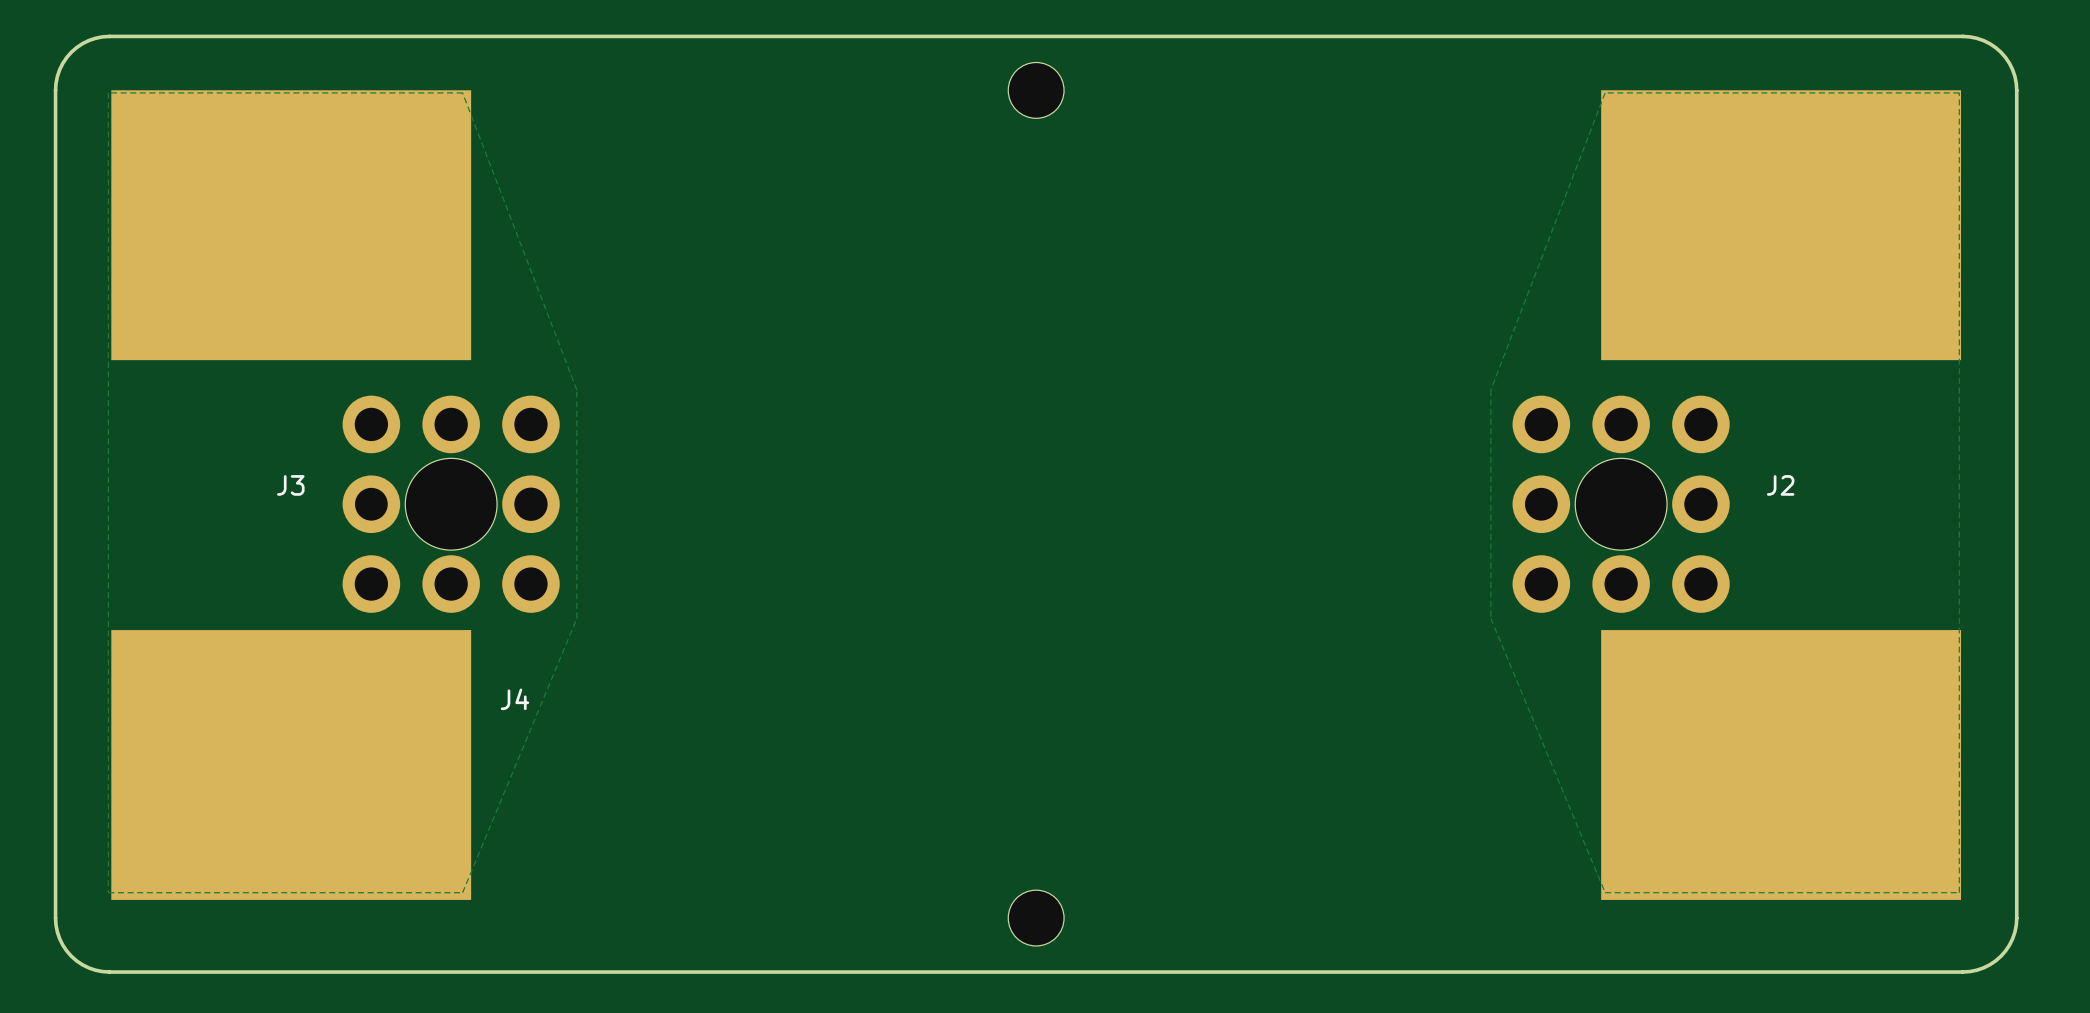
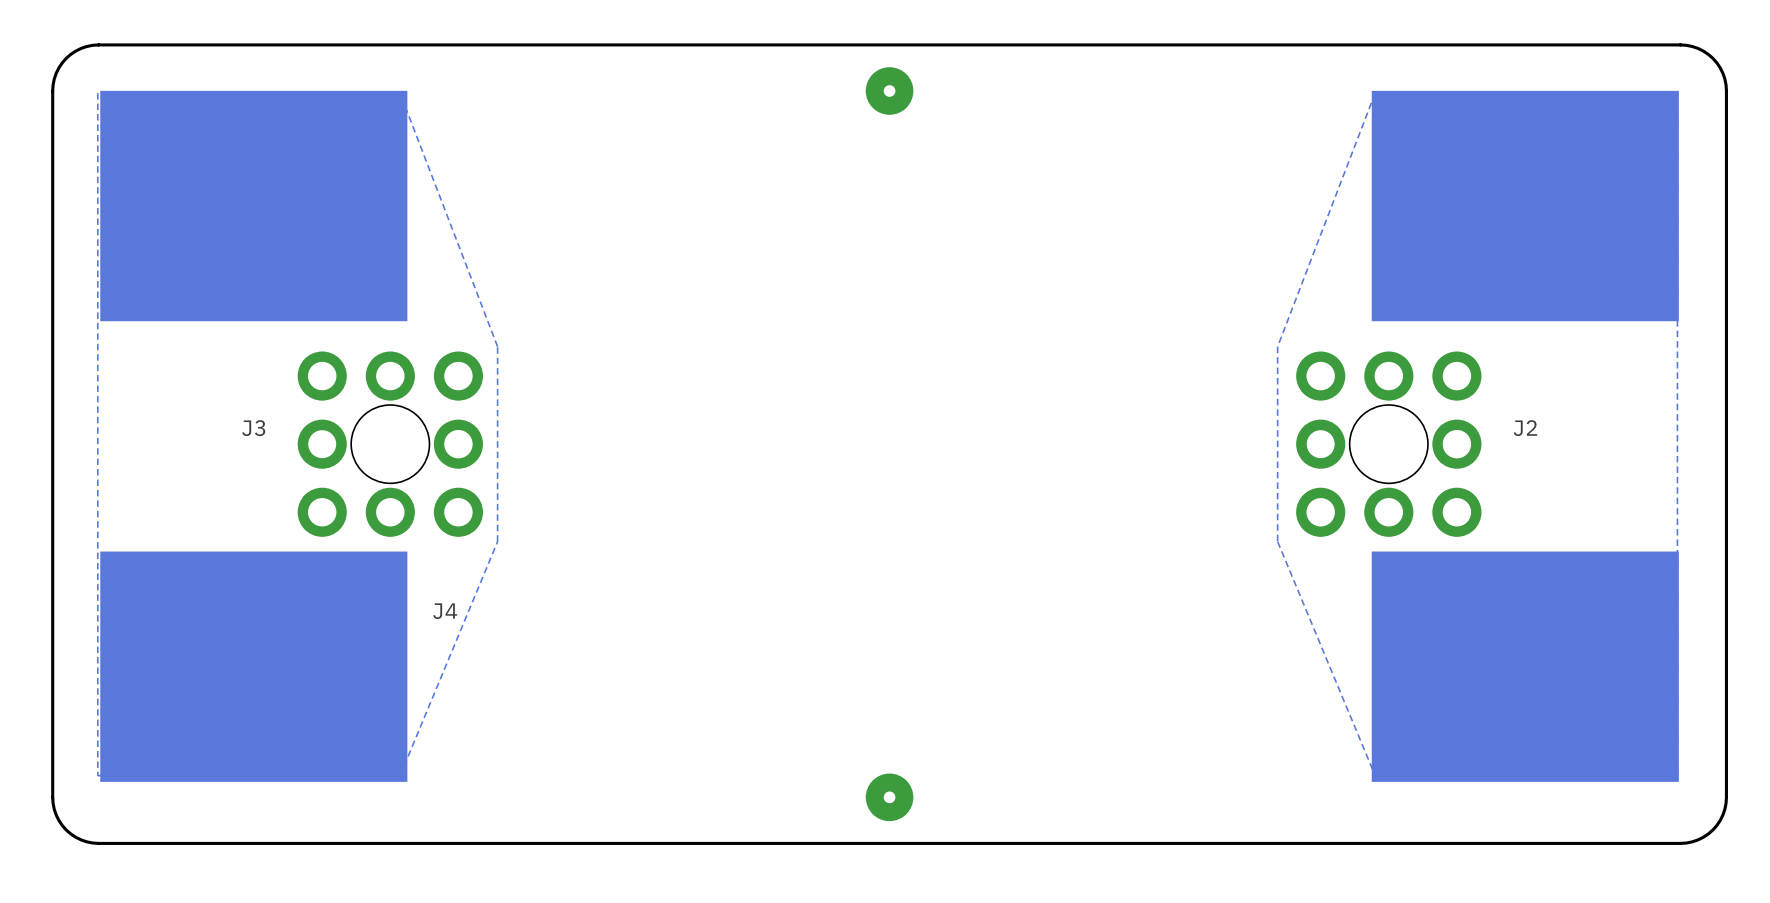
part footprint: [1008, 62, 1065, 119] -> [865, 67, 914, 115]
part footprint: [1008, 890, 1065, 946] -> [865, 773, 914, 822]

